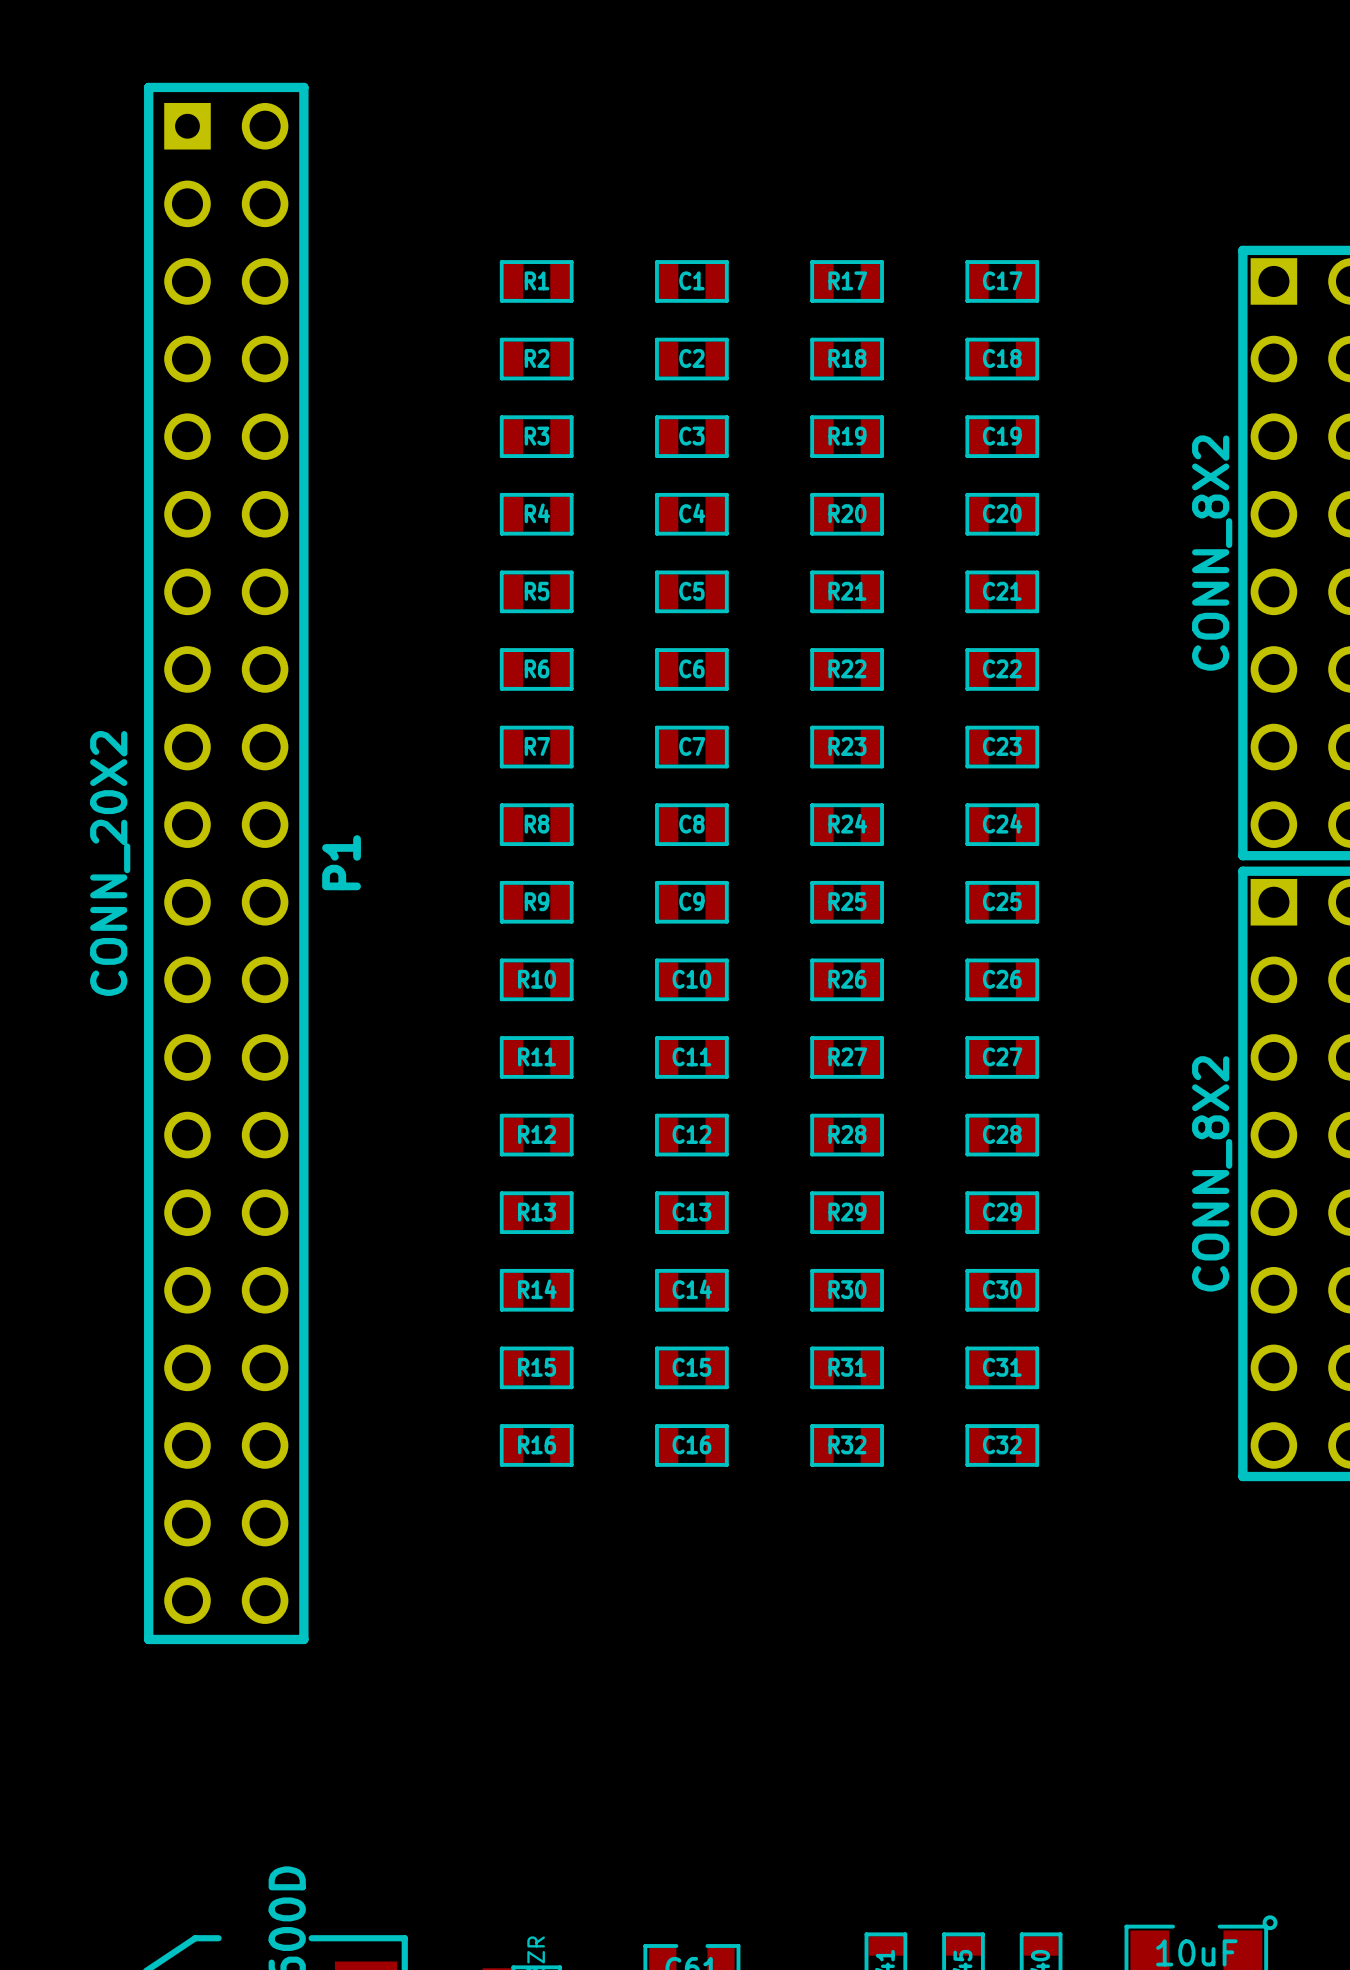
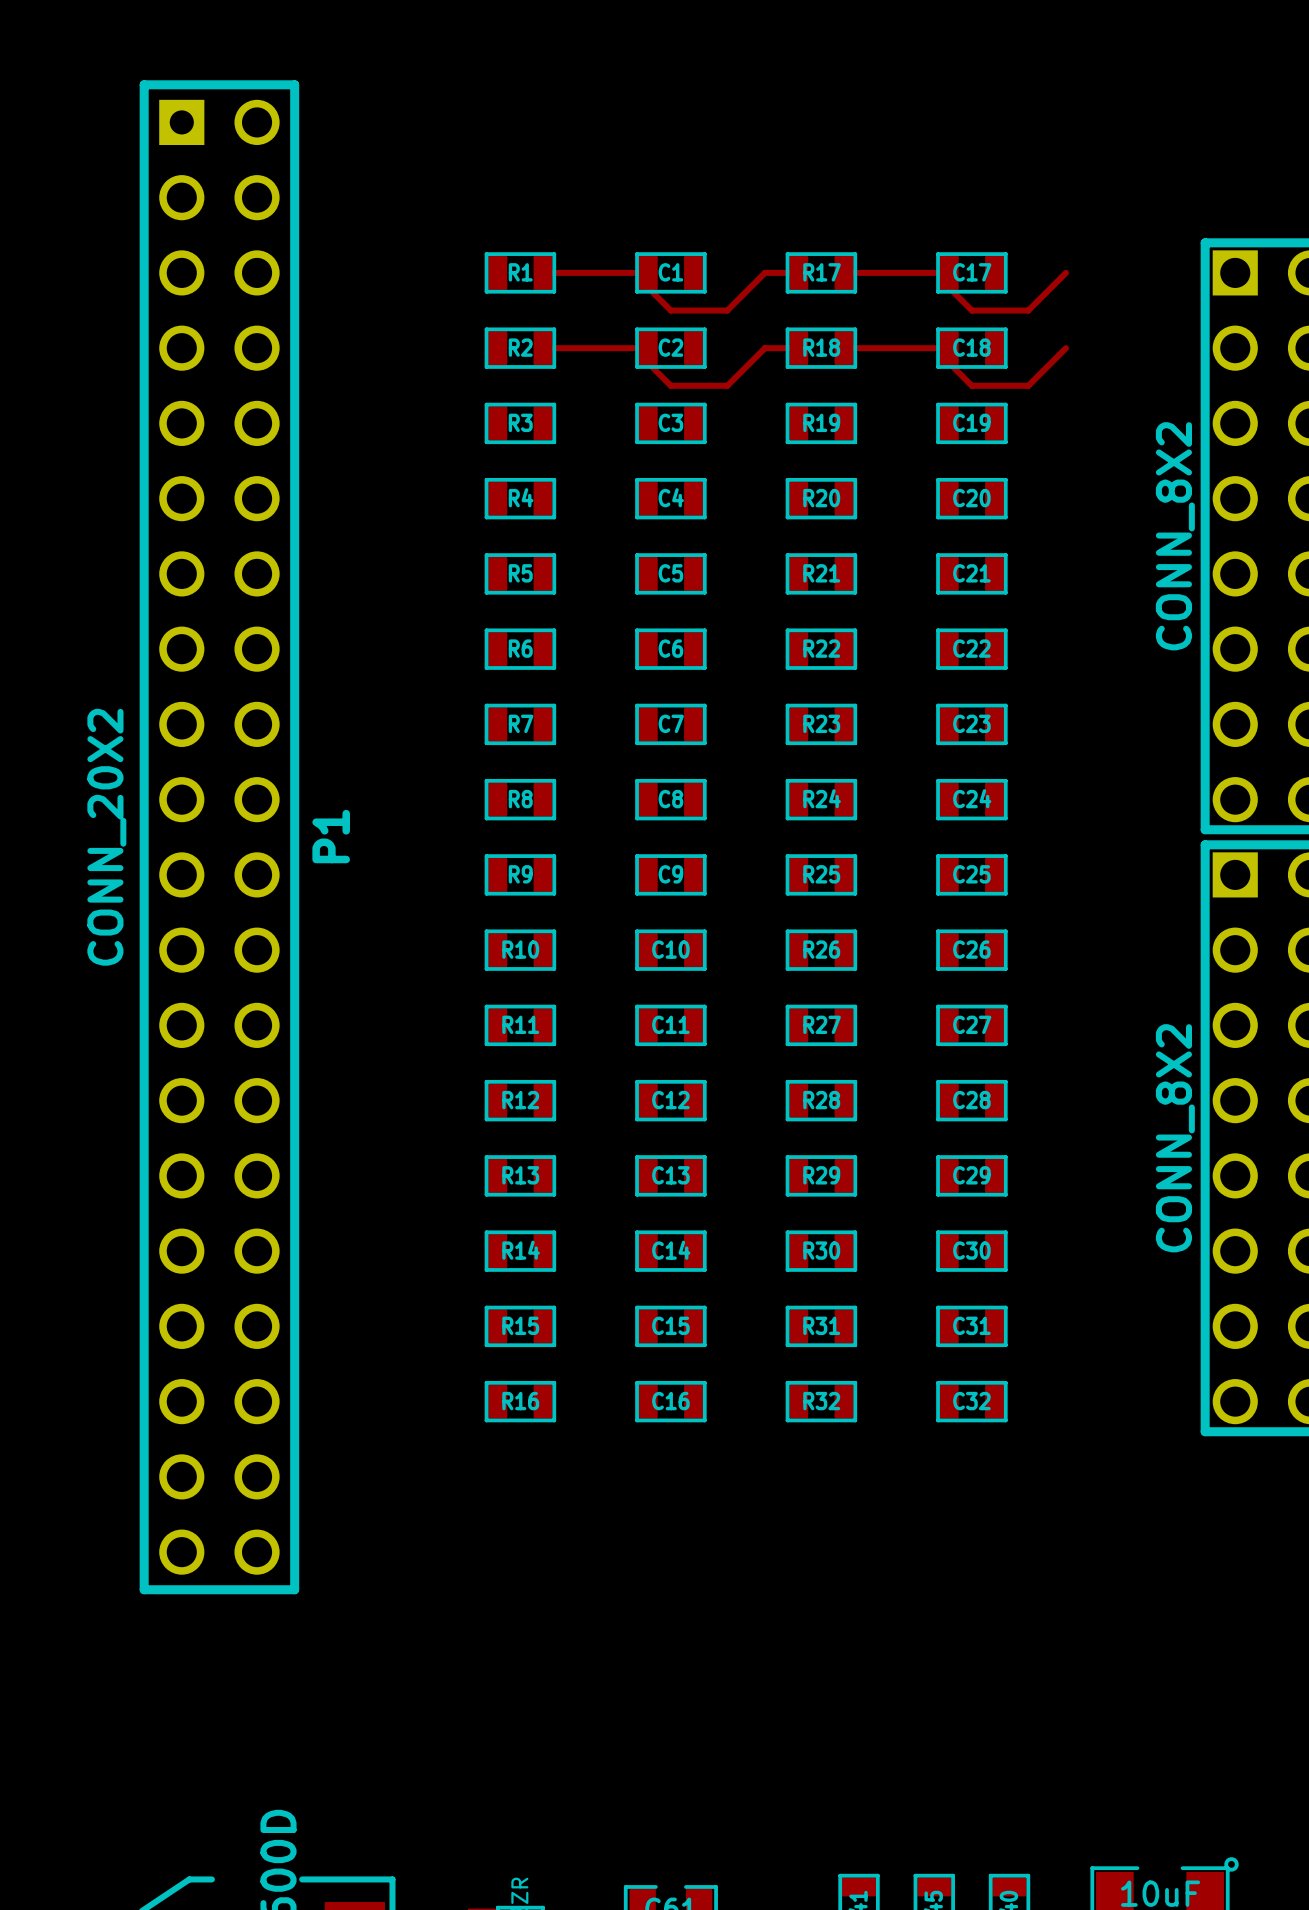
track: none -> (542, 272) (648, 272) (648, 287) (670, 310) (727, 310) (764, 272) (798, 272)
track: none -> (843, 272) (949, 272) (949, 287) (971, 310) (1028, 310) (1065, 272)
track: none -> (542, 348) (648, 348) (648, 363) (670, 385) (727, 385) (764, 348) (798, 348)
track: none -> (843, 348) (949, 348) (949, 363) (971, 385) (1028, 385) (1065, 348)

